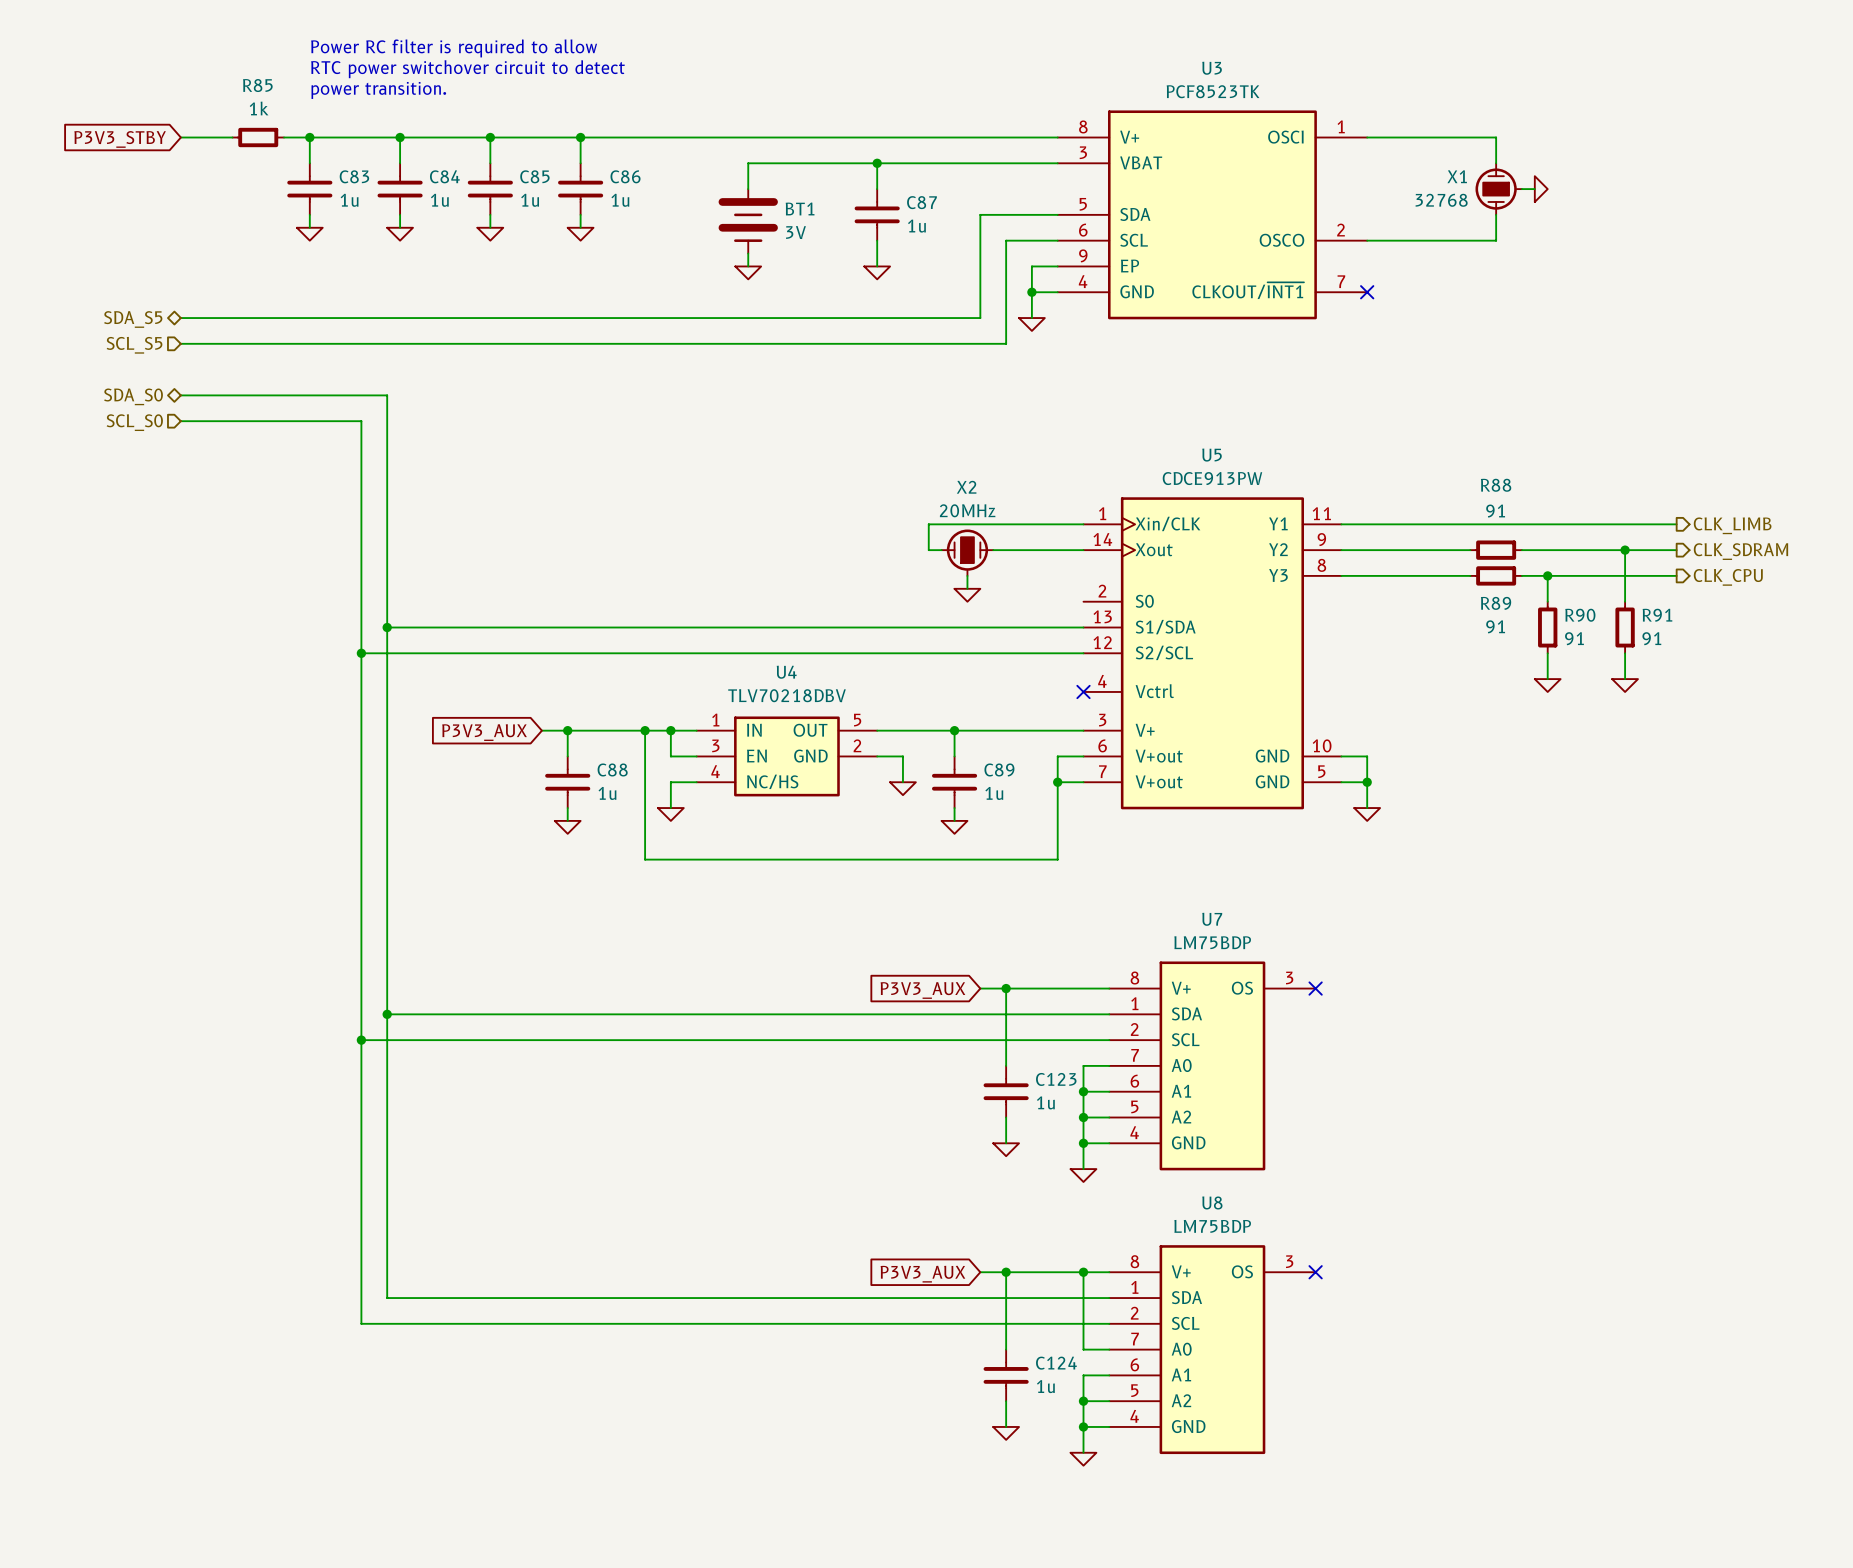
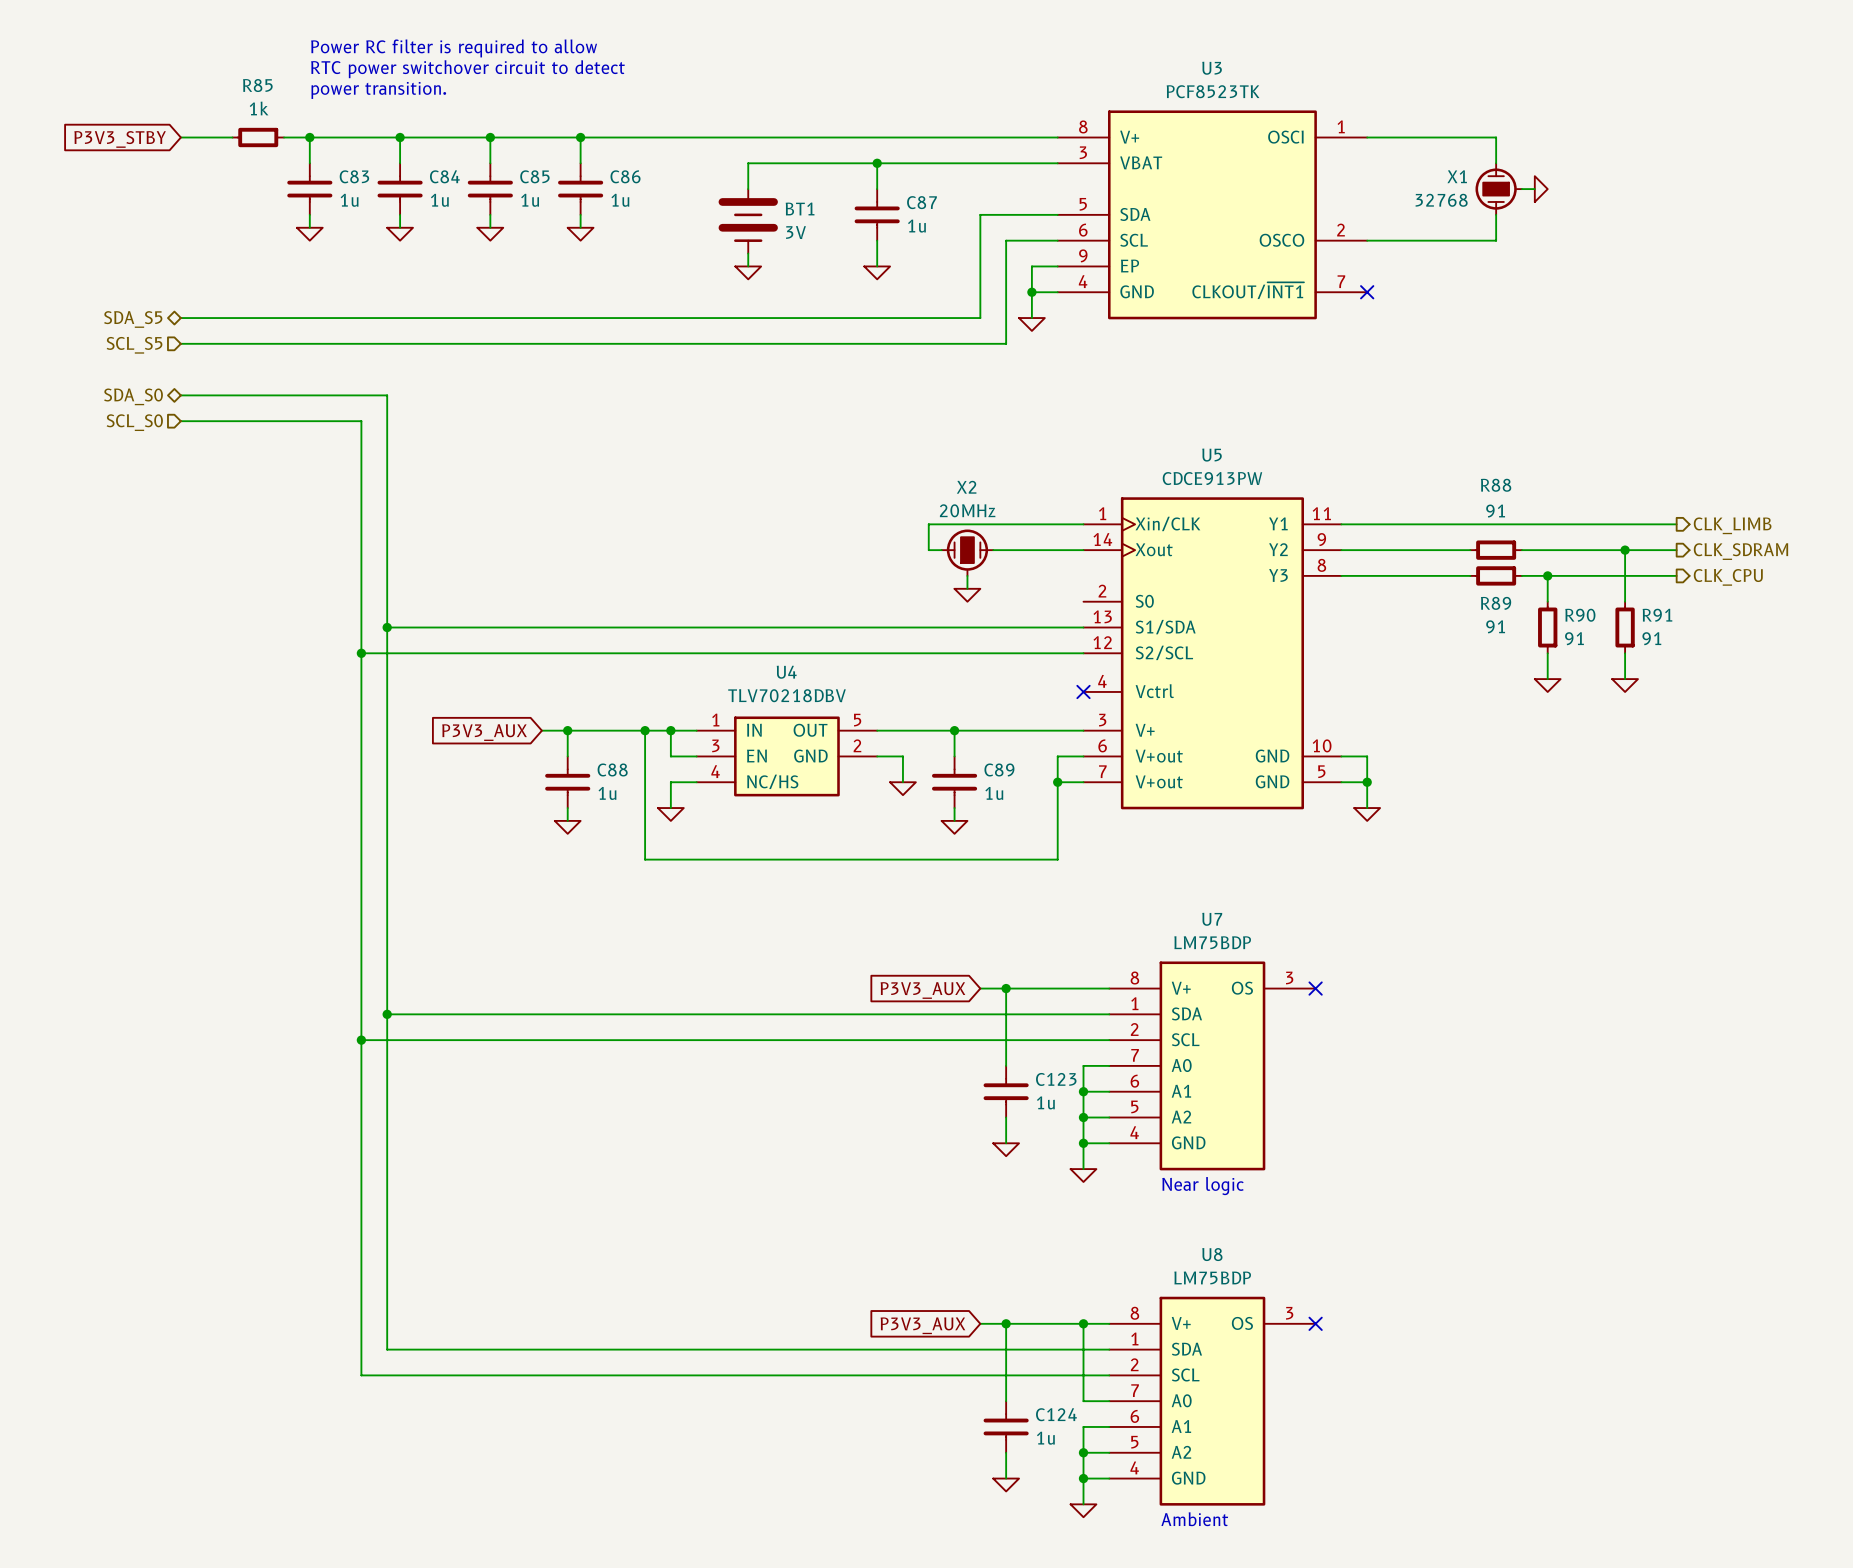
text: none -> Near logic (1202, 1186)
wire: (980, 1272) (1109, 1272) -> none
wire: (1006, 1272) (1006, 1323) -> none
junction: (1006, 1272) -> none
wire: (1083, 1272) (1083, 1323) -> none
junction: (1083, 1272) -> none
no-connect mark position: (1315, 1272) -> (1315, 1323)
global label position: P3V3_AUX (922, 1274) -> P3V3_AUX (922, 1325)
wire: (387, 1298) (1109, 1298) -> none
wire: (361, 1323) (980, 1323) -> (361, 1323) (361, 1375) (1083, 1375) (1083, 1349) (387, 1349) (387, 1298)
junction: none -> (1006, 1323)
junction: none -> (1083, 1323)
U8 position: (1212, 1349) -> (1212, 1401)
C124 position: (1006, 1375) -> (1006, 1426)
wire: (1083, 1401) (1083, 1426) -> (1006, 1452) (1006, 1478)
junction: (1083, 1401) -> none
junction: (1083, 1426) -> none
power symbol: (1006, 1433) -> none
junction: none -> (1083, 1452)
wire: none -> (1109, 1452) (1083, 1452) (1083, 1504)
power symbol: (1083, 1459) -> none
wire: none -> (1083, 1478) (1109, 1478)
junction: none -> (1083, 1478)
power symbol: none -> (1006, 1485)
power symbol: none -> (1083, 1510)
text: none -> Ambient (1194, 1519)

